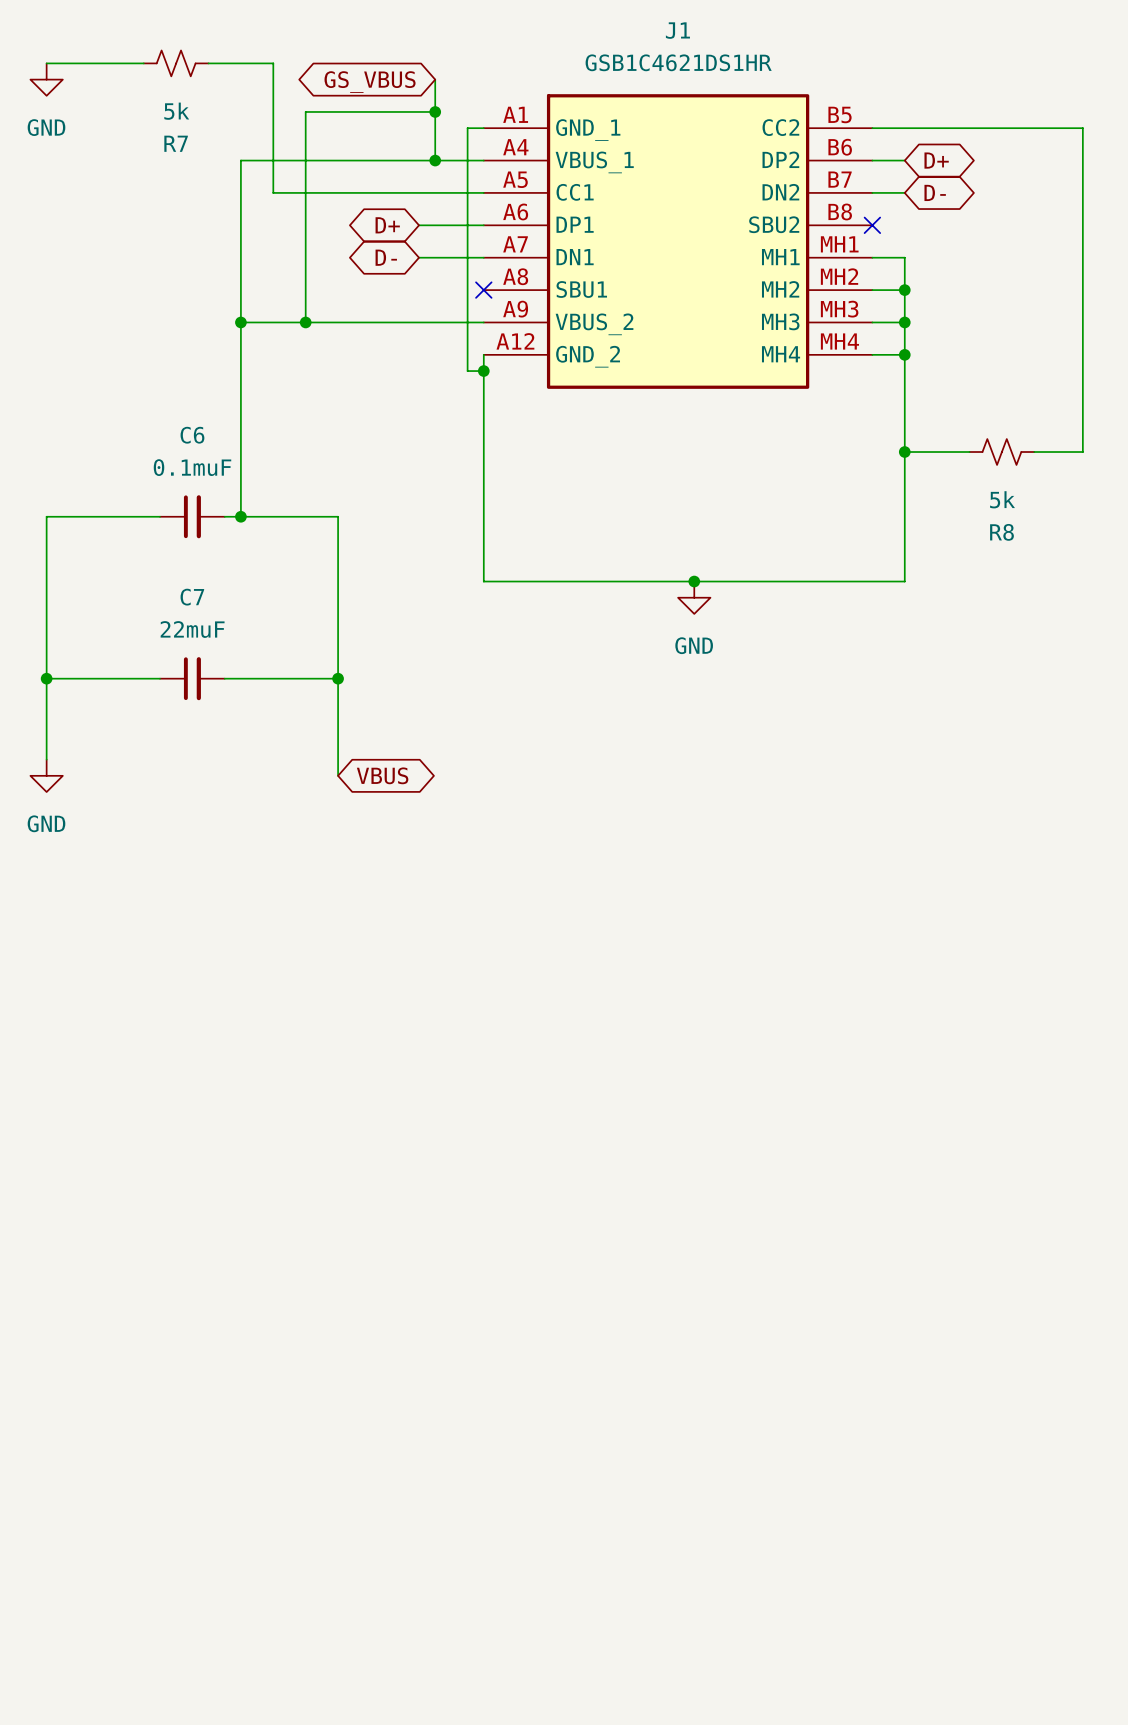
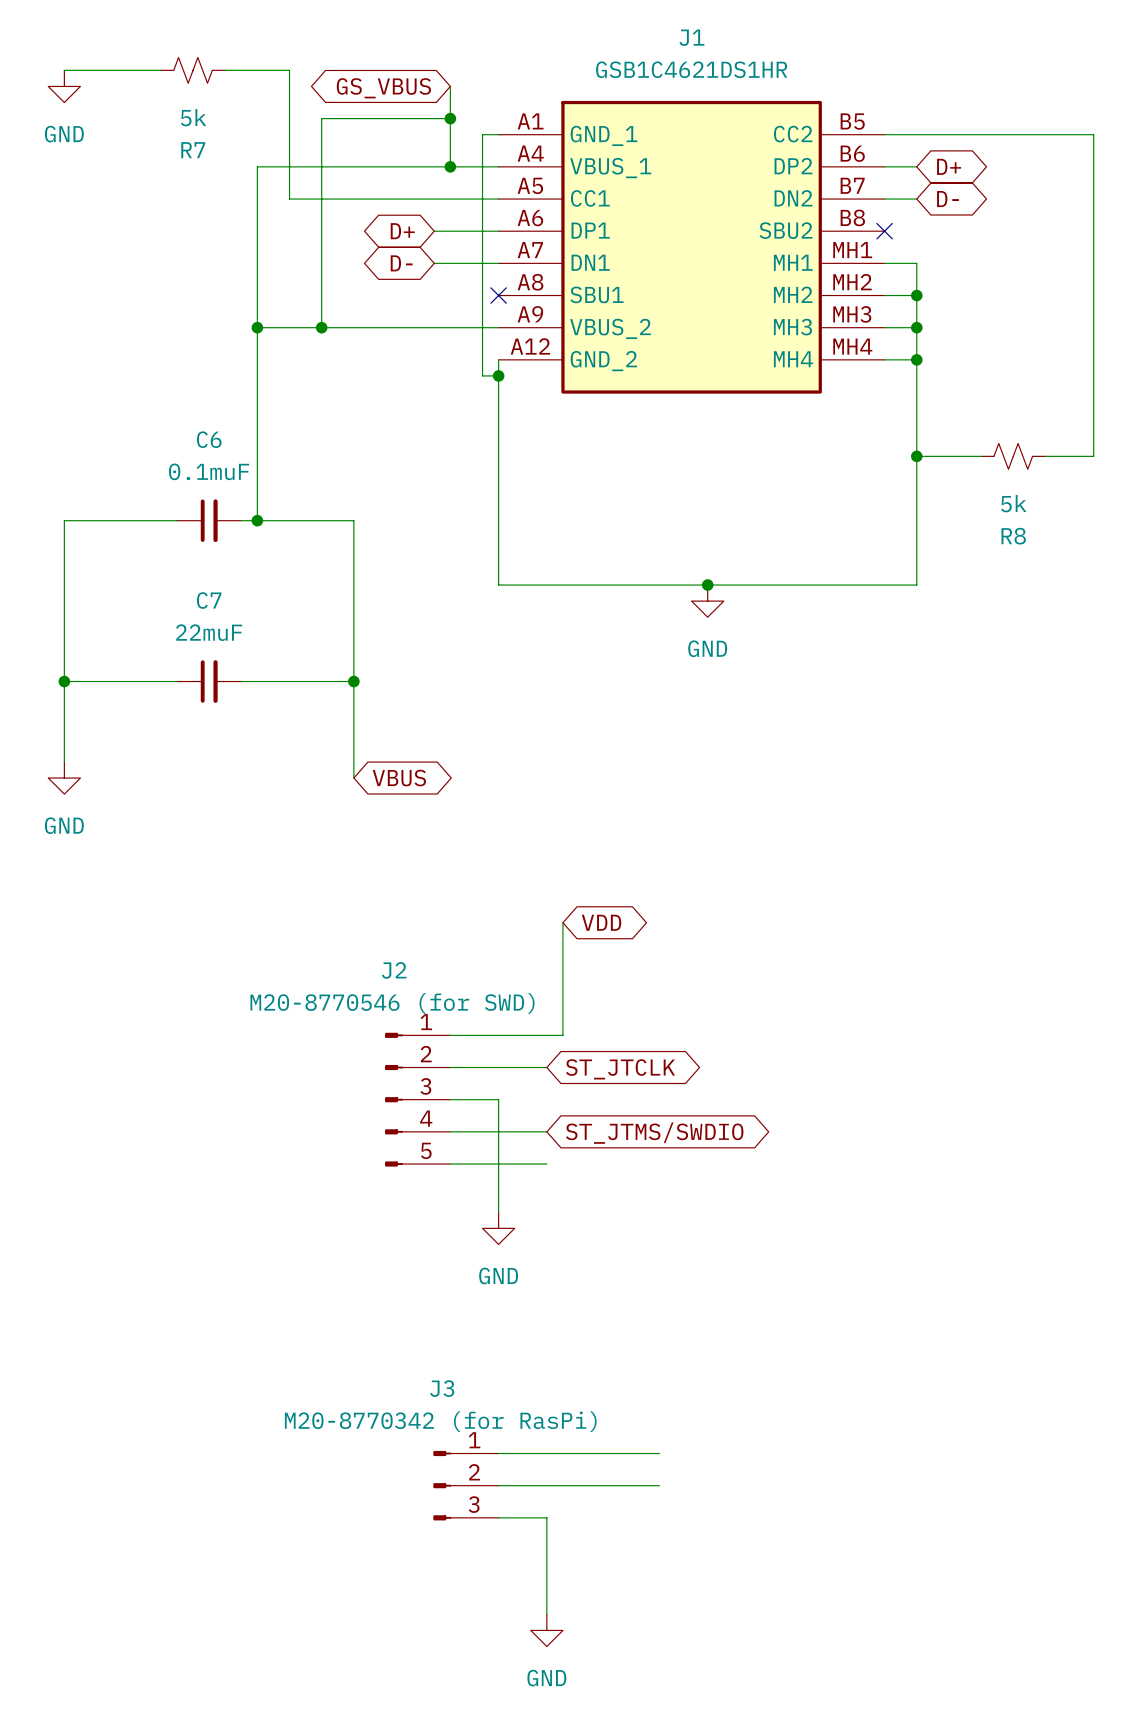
wire: none -> (562, 922) (562, 1035) (450, 1035)
global label: none -> VDD (601, 922)
wire: none -> (450, 1067) (546, 1067)
global label: none -> ST_JTCLK (620, 1069)
J2: none -> M20-8770546 (for SWD) (417, 1099)
wire: none -> (450, 1099) (498, 1099) (498, 1212)
wire: none -> (450, 1131) (546, 1131)
global label: none -> ST_JTMS/SWDIO (654, 1133)
wire: none -> (450, 1164) (546, 1164)
power symbol: none -> GND (498, 1228)
wire: none -> (498, 1453) (659, 1453)
J3: none -> M20-8770342 (for RasPi) (465, 1485)
wire: none -> (498, 1485) (659, 1485)
wire: none -> (498, 1517) (546, 1517) (546, 1614)
power symbol: none -> GND (546, 1630)

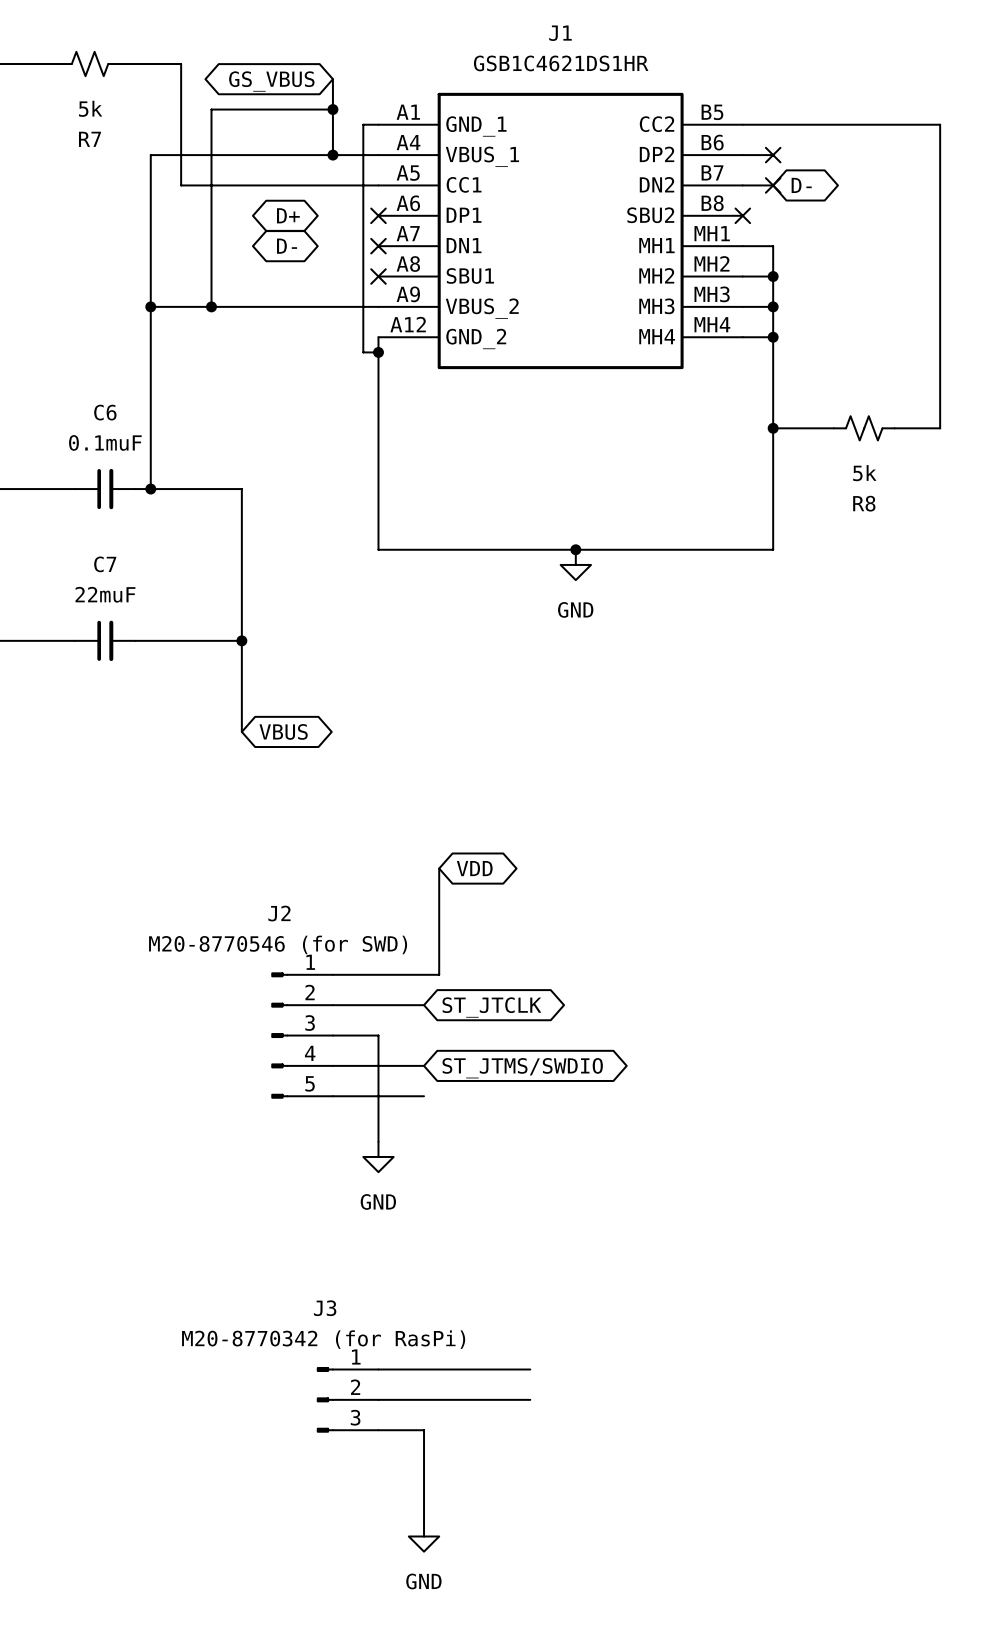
no-connect mark: none -> (773, 155)
global label: D+ (949, 166) -> none
no-connect mark: none -> (773, 185)
wire: (434, 231) (498, 231) -> none
no-connect mark: none -> (378, 215)
wire: (434, 263) (498, 263) -> none
no-connect mark: none -> (378, 246)

